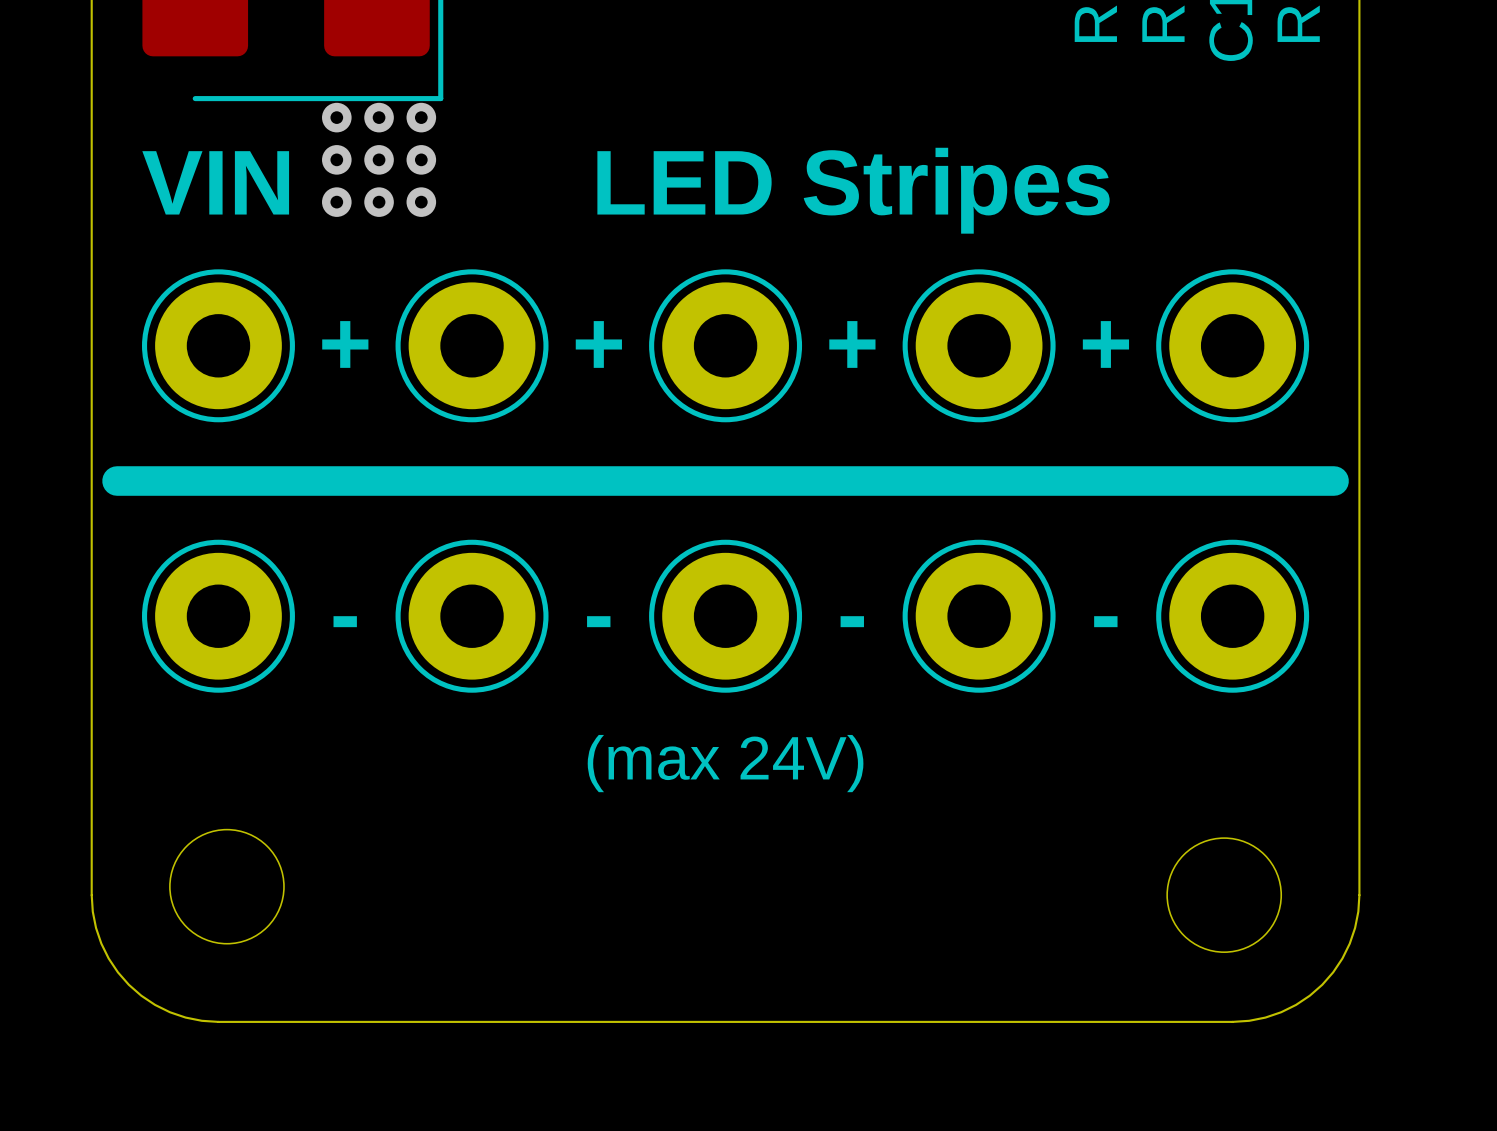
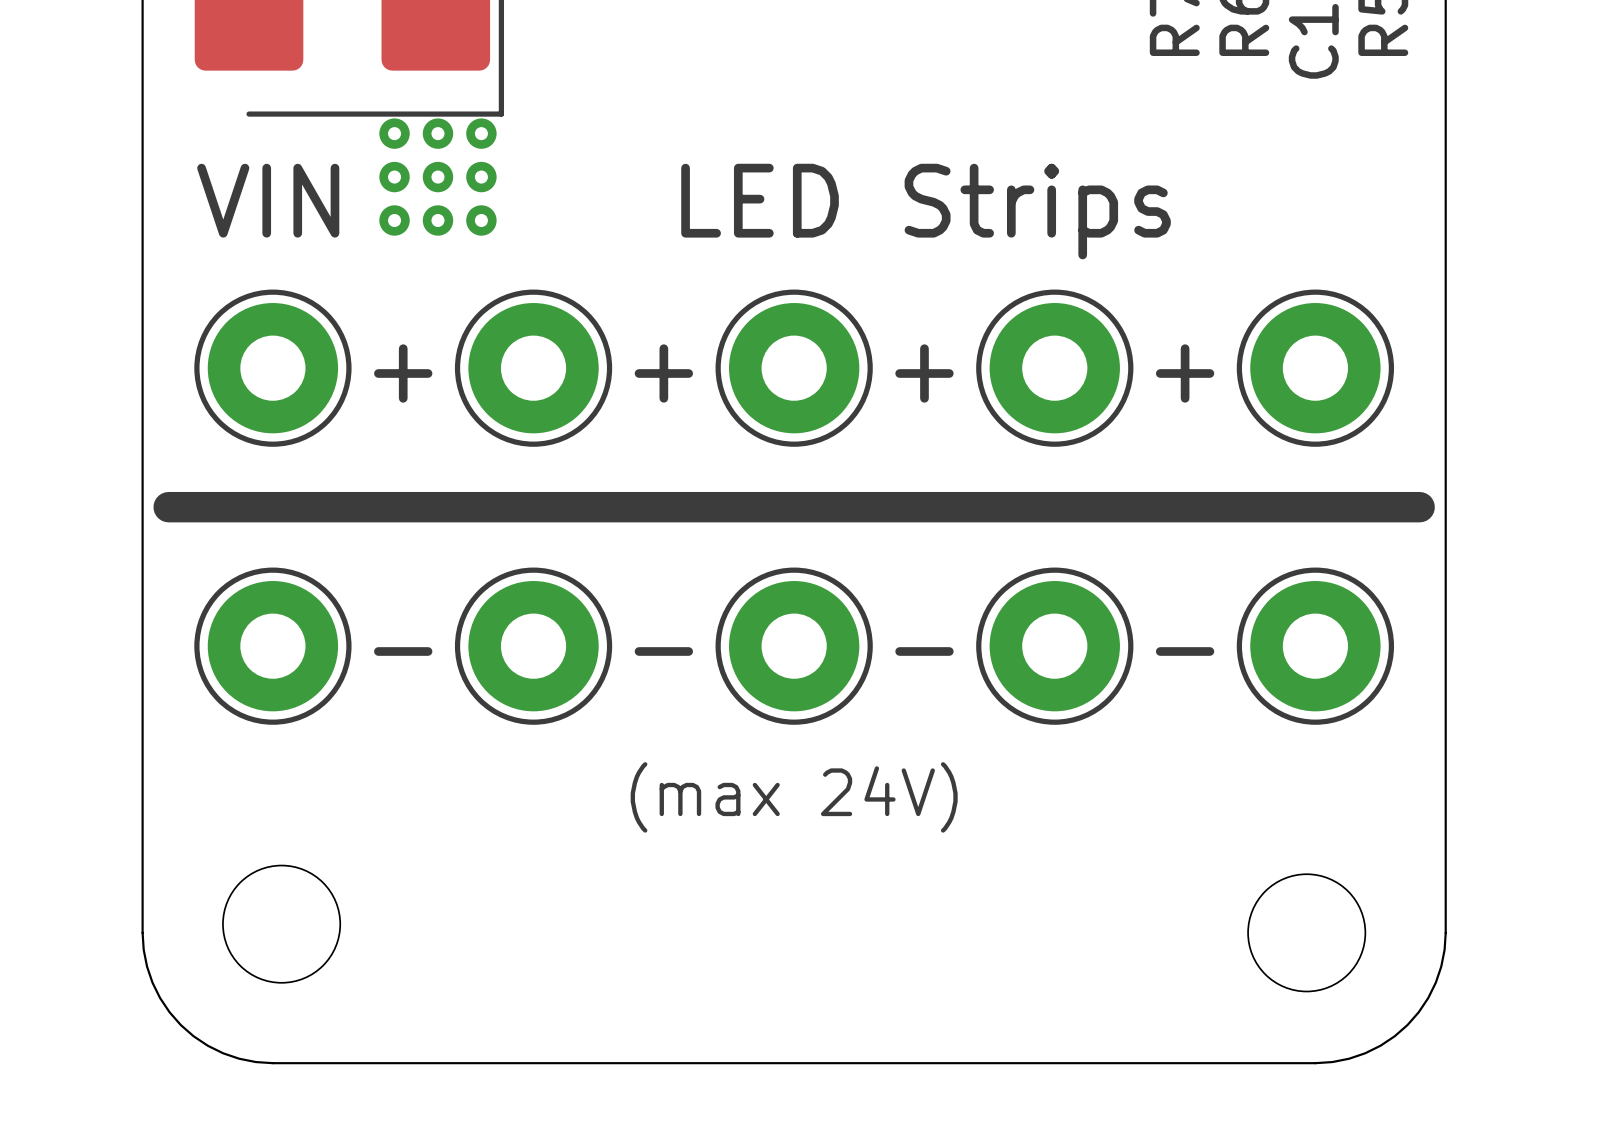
text: LED Stripes (853, 190) -> LED Strips (926, 211)

